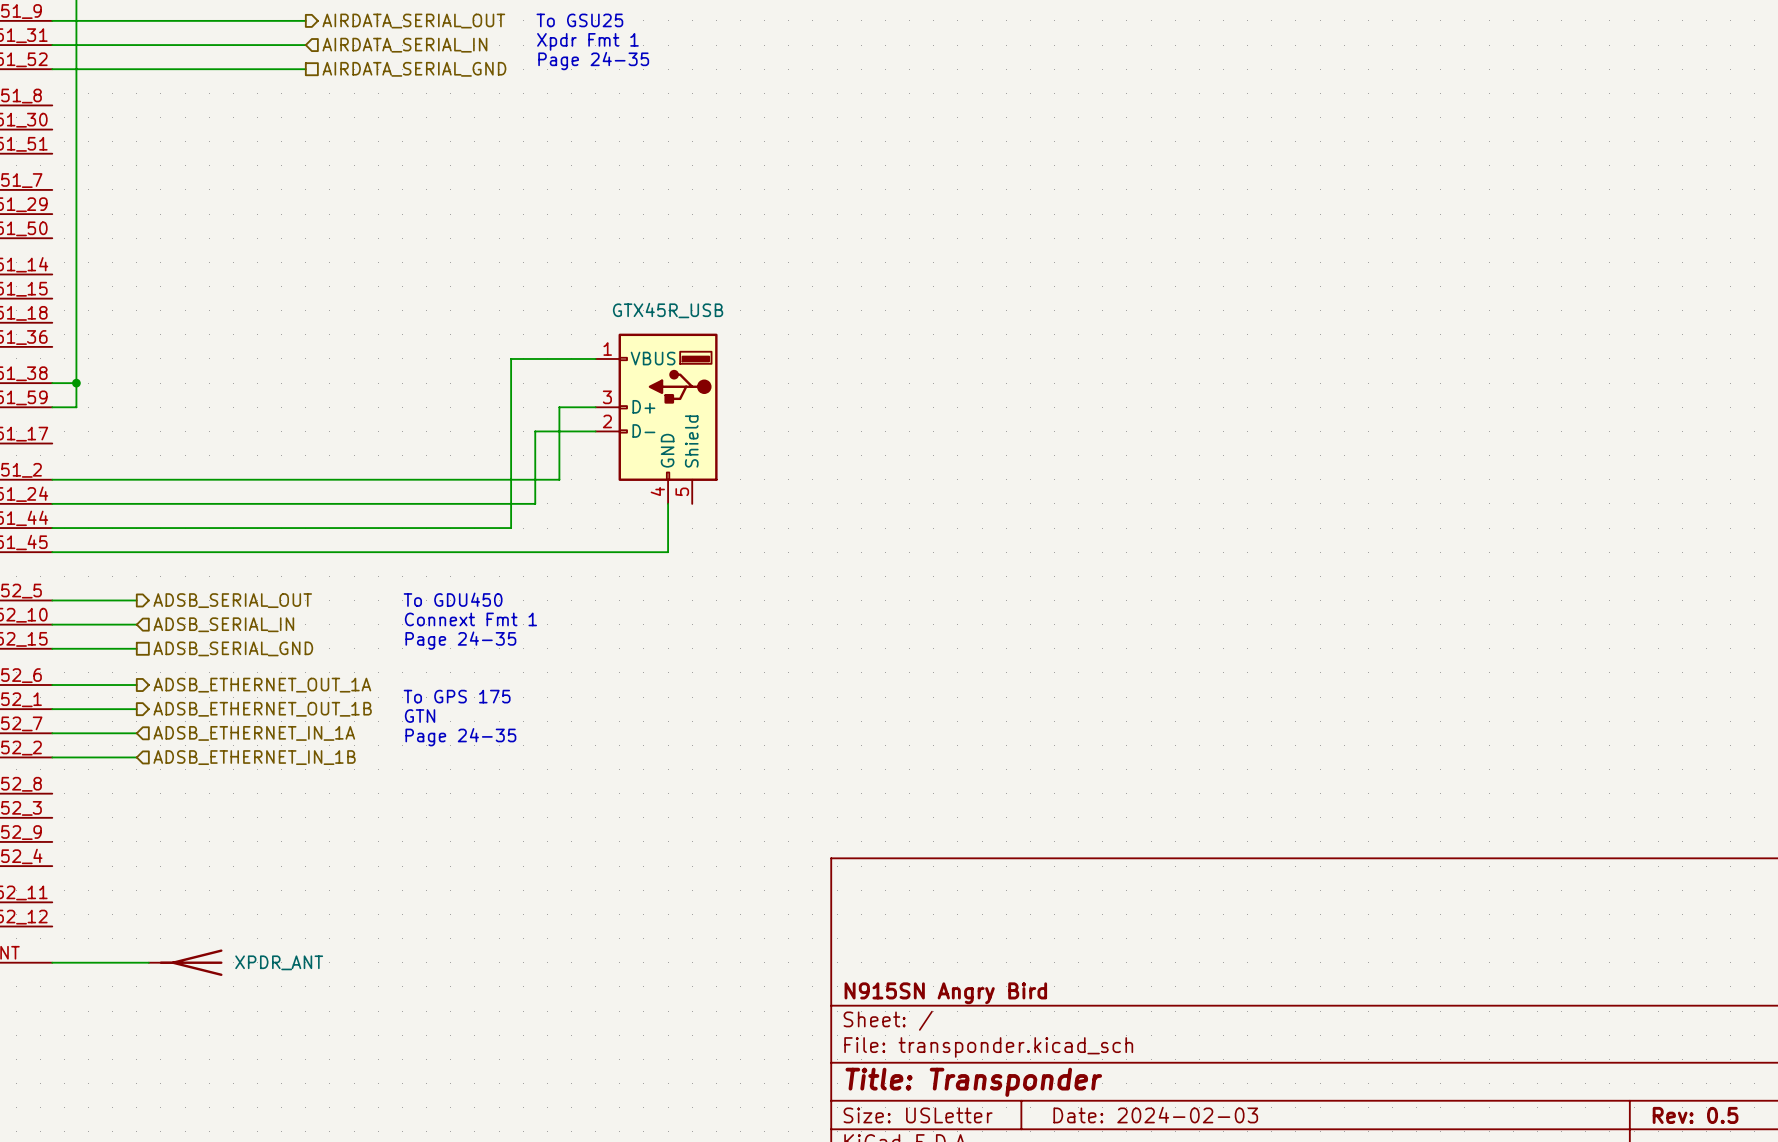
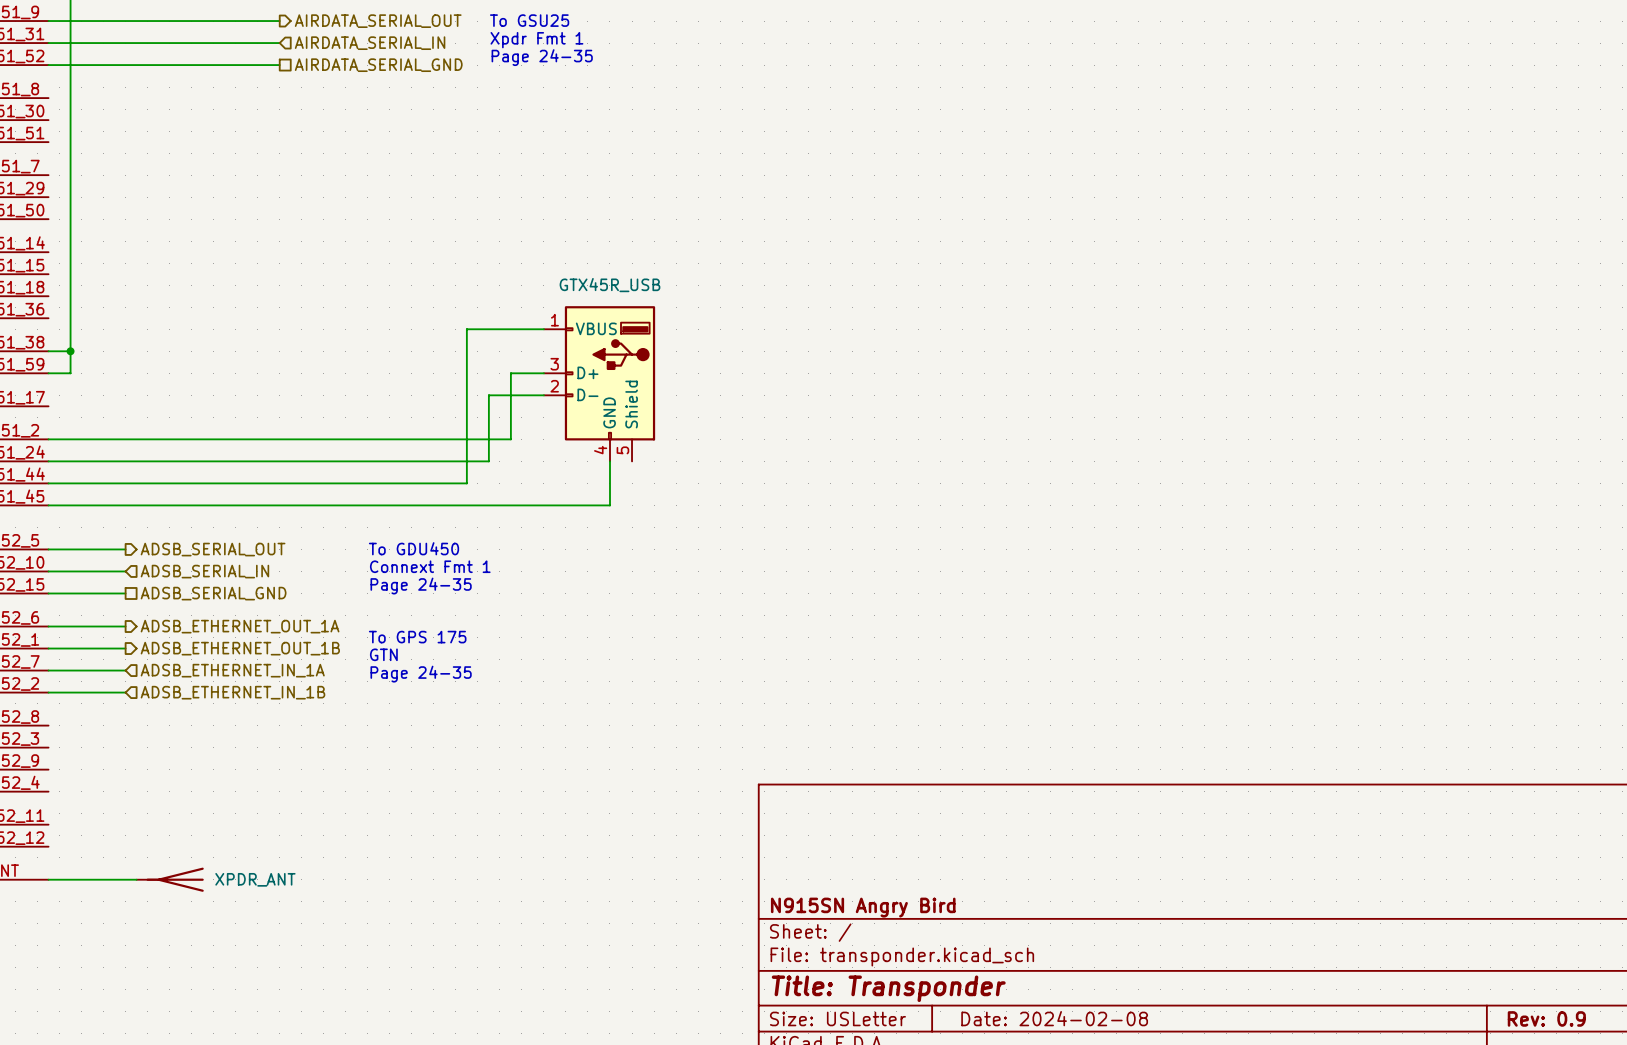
title block: Date: 2024-02-03 (1155, 1115) -> Date: 2024-02-08 (1054, 1018)
title block: Rev: 0.5 (1695, 1115) -> Rev: 0.9 (1546, 1018)

